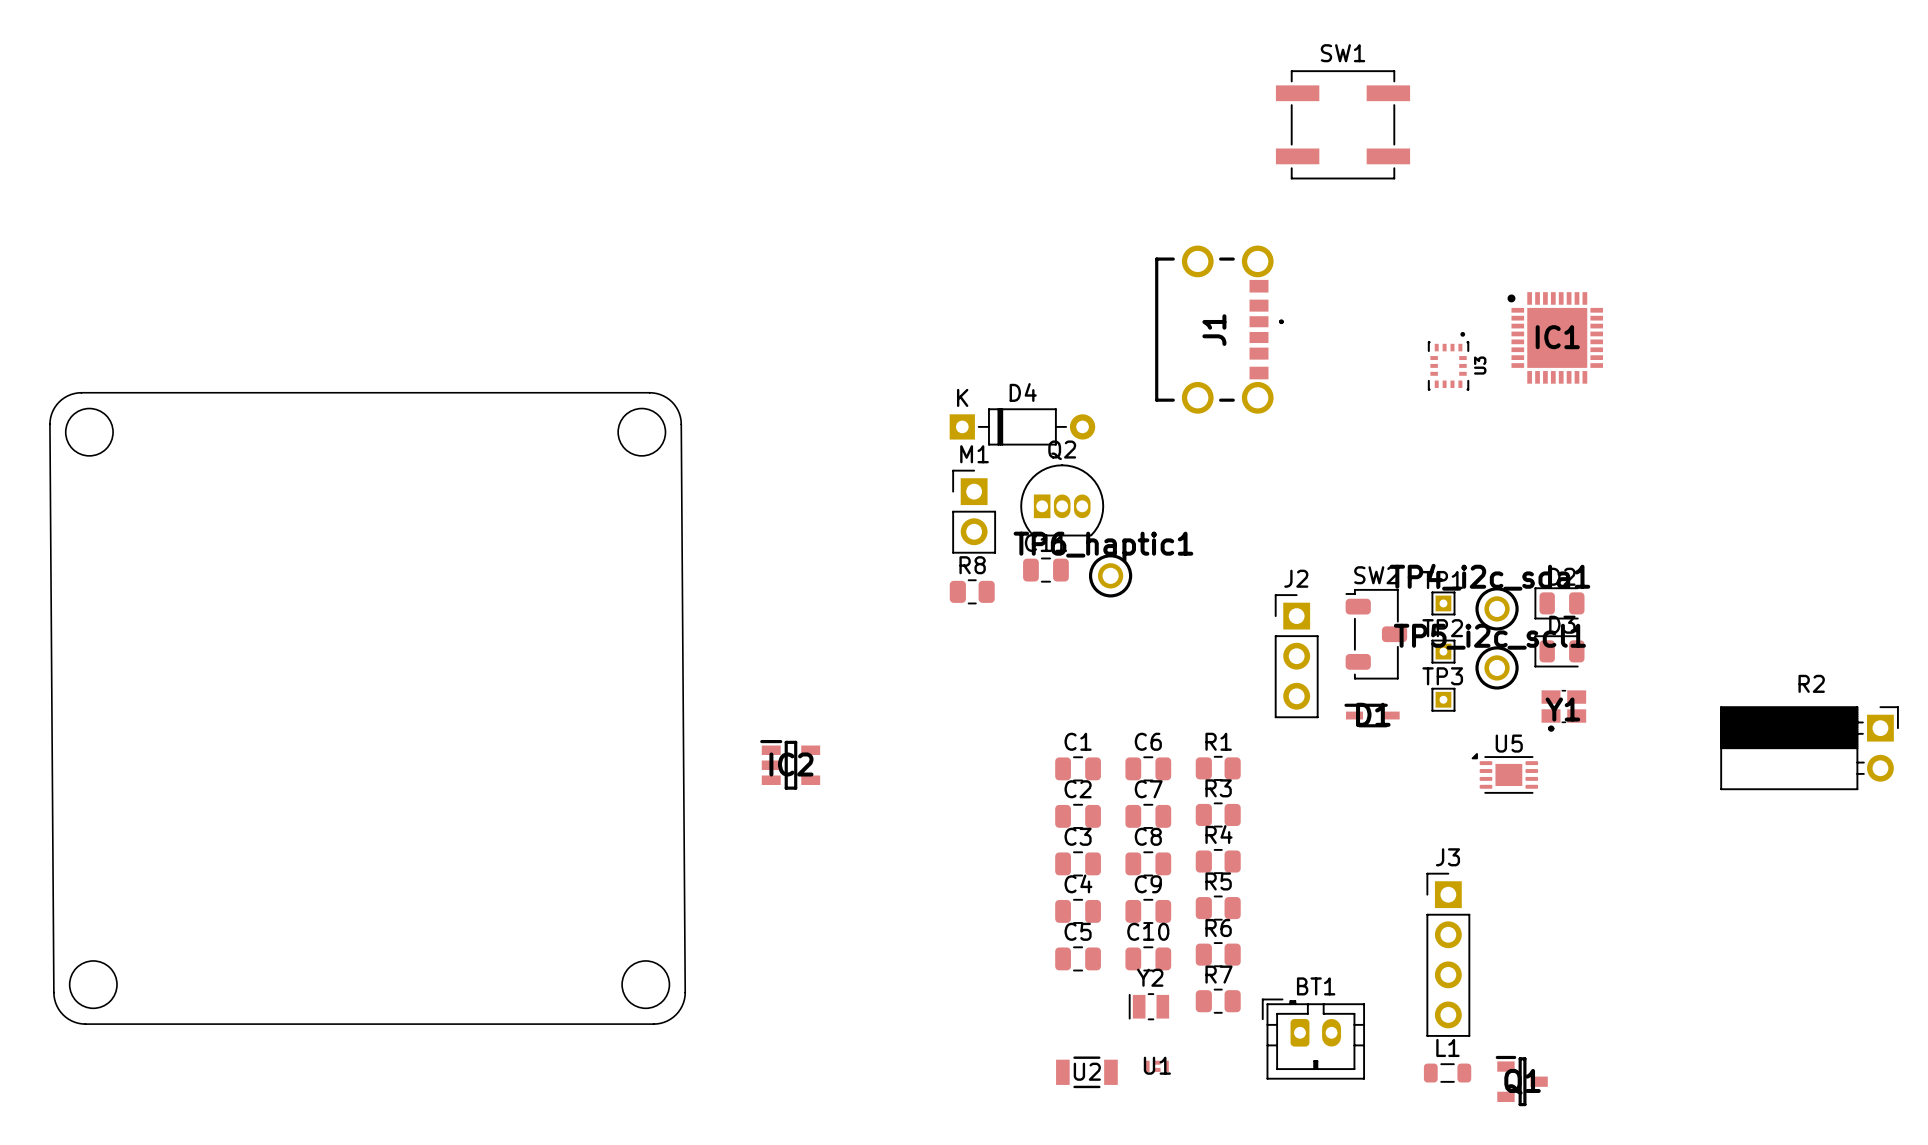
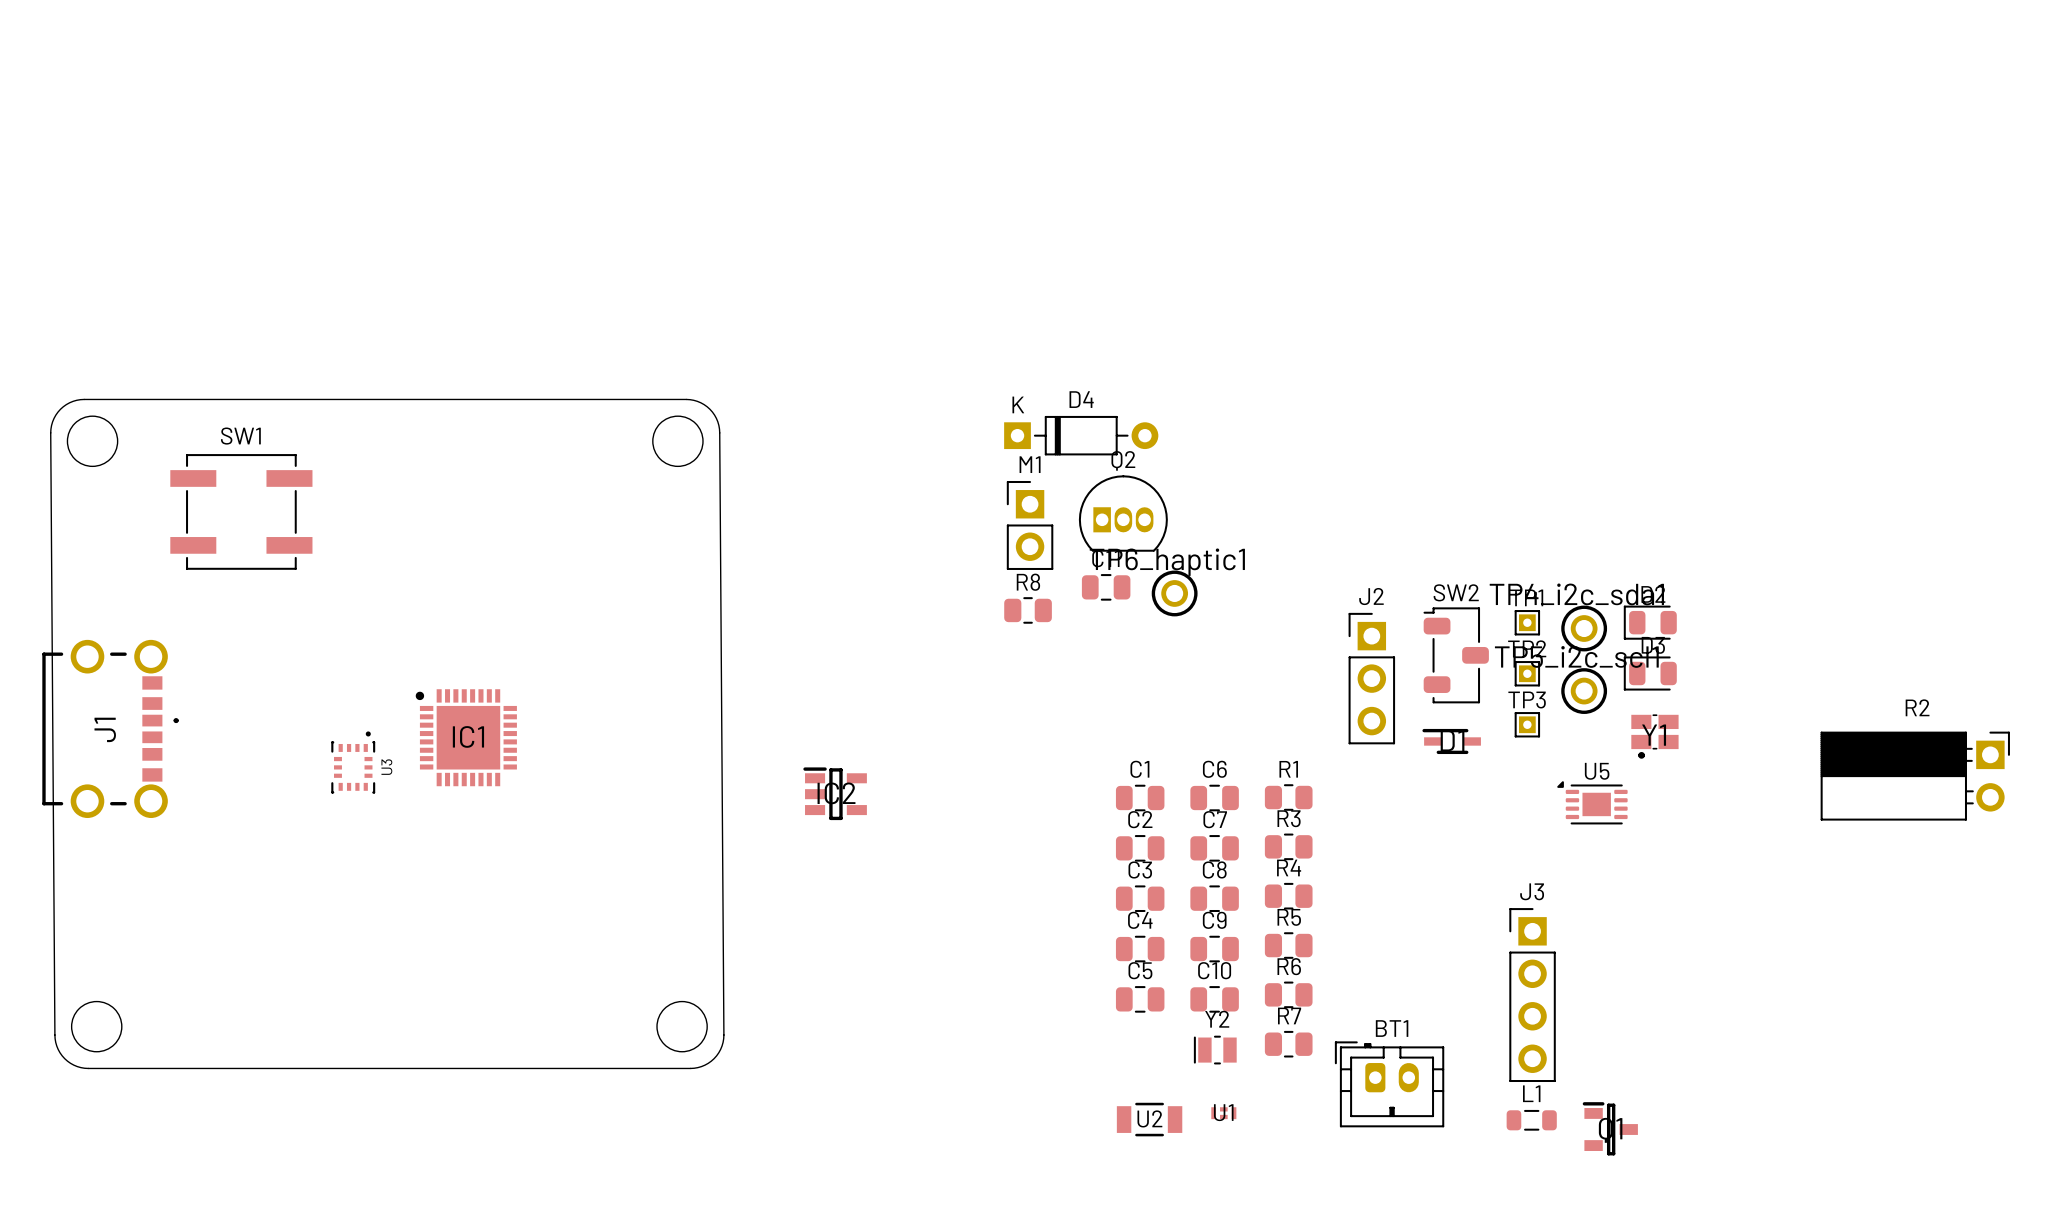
SW1 position: (1343, 124) -> (241, 511)
J1 position: (1219, 329) -> (110, 728)
IC1 position: (1555, 337) -> (466, 737)
U3 position: (1448, 361) -> (353, 762)

